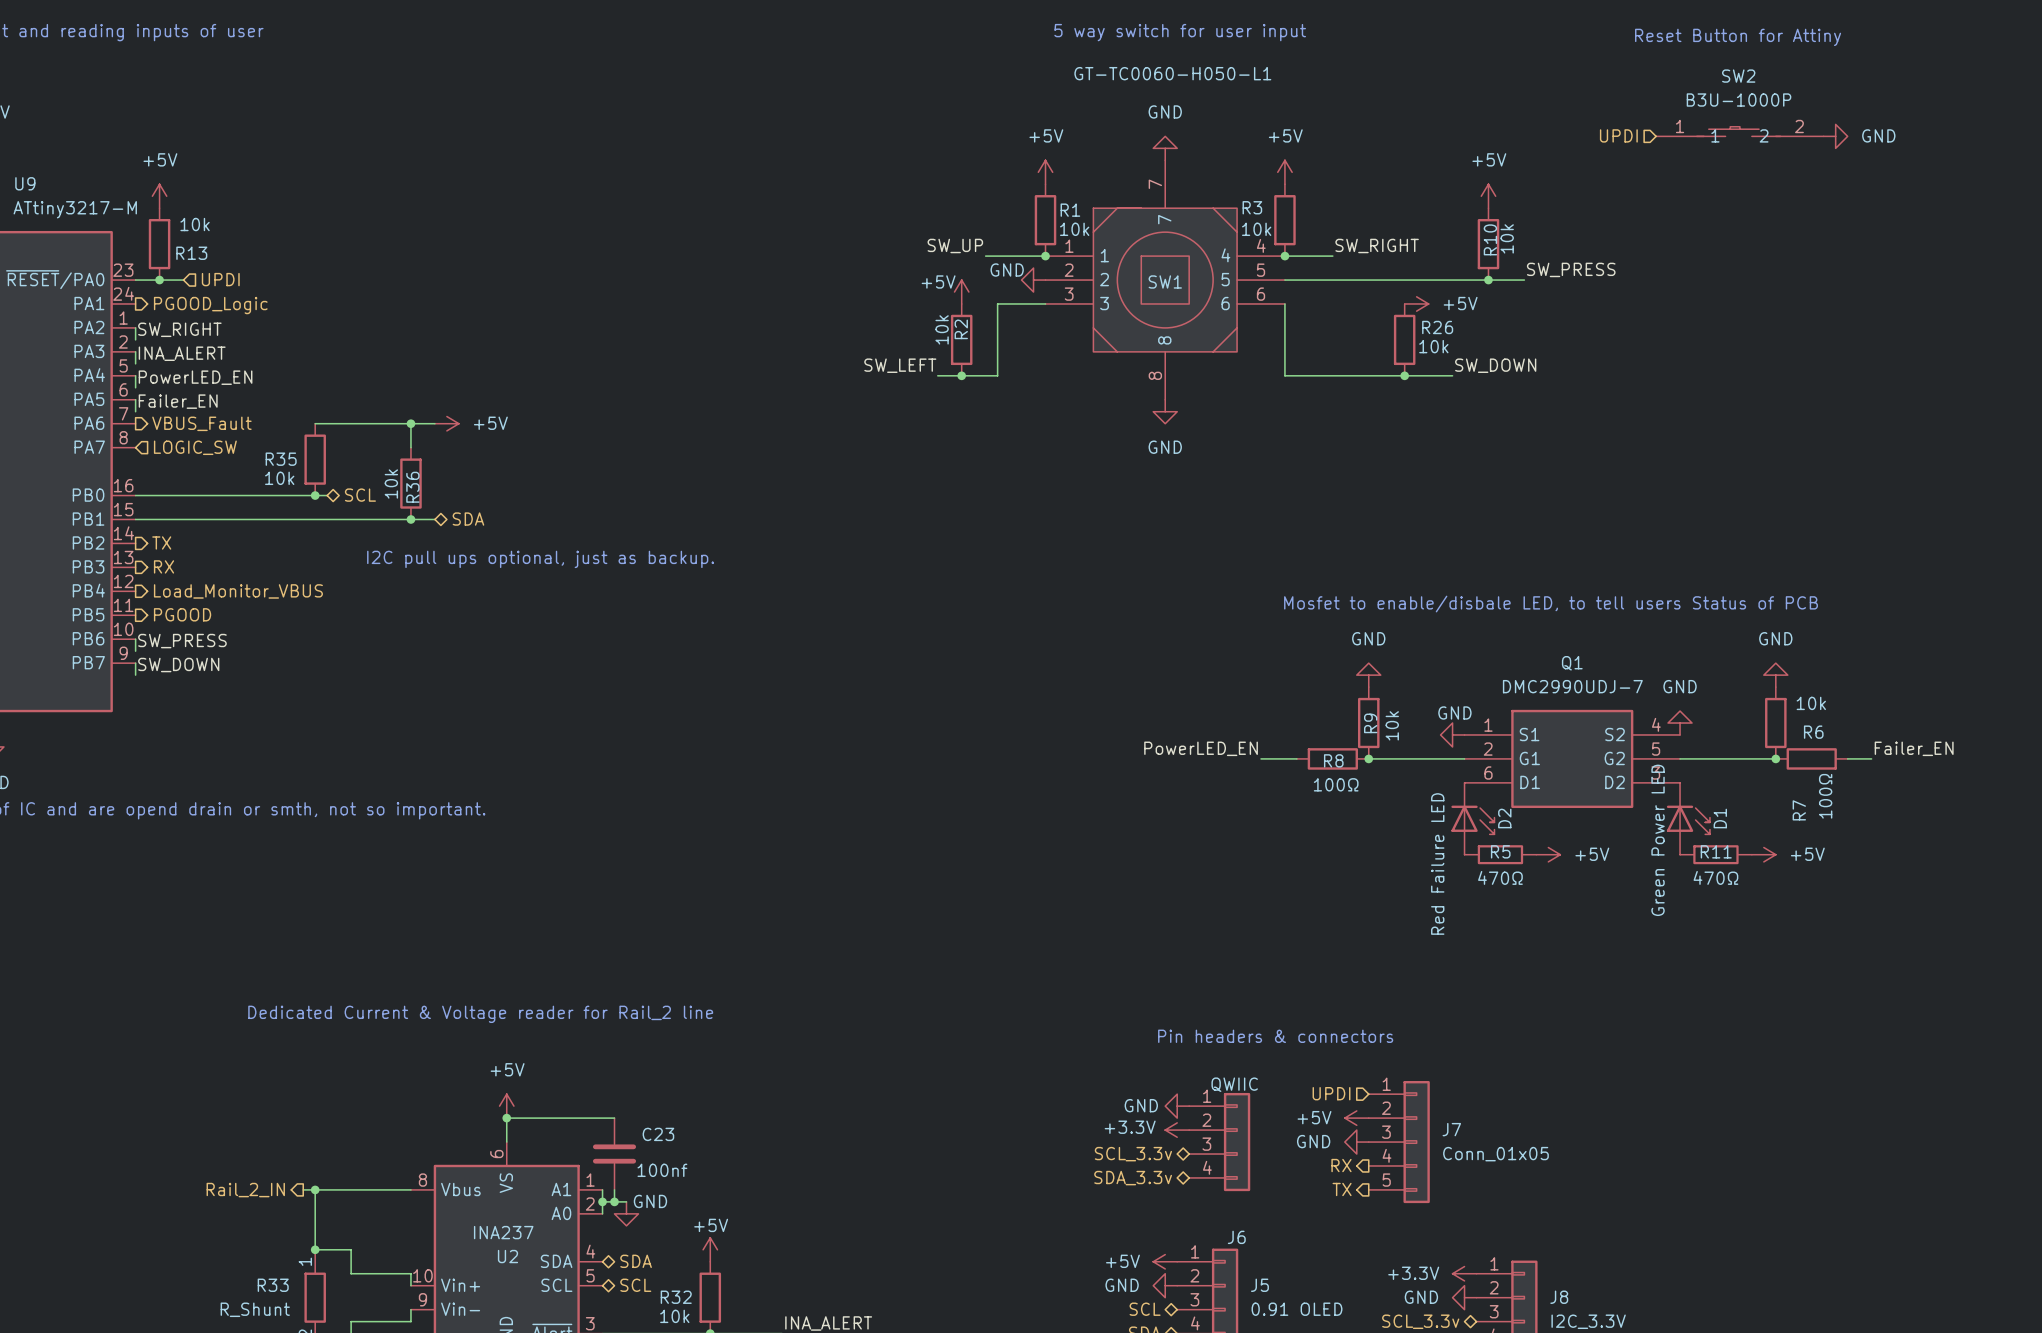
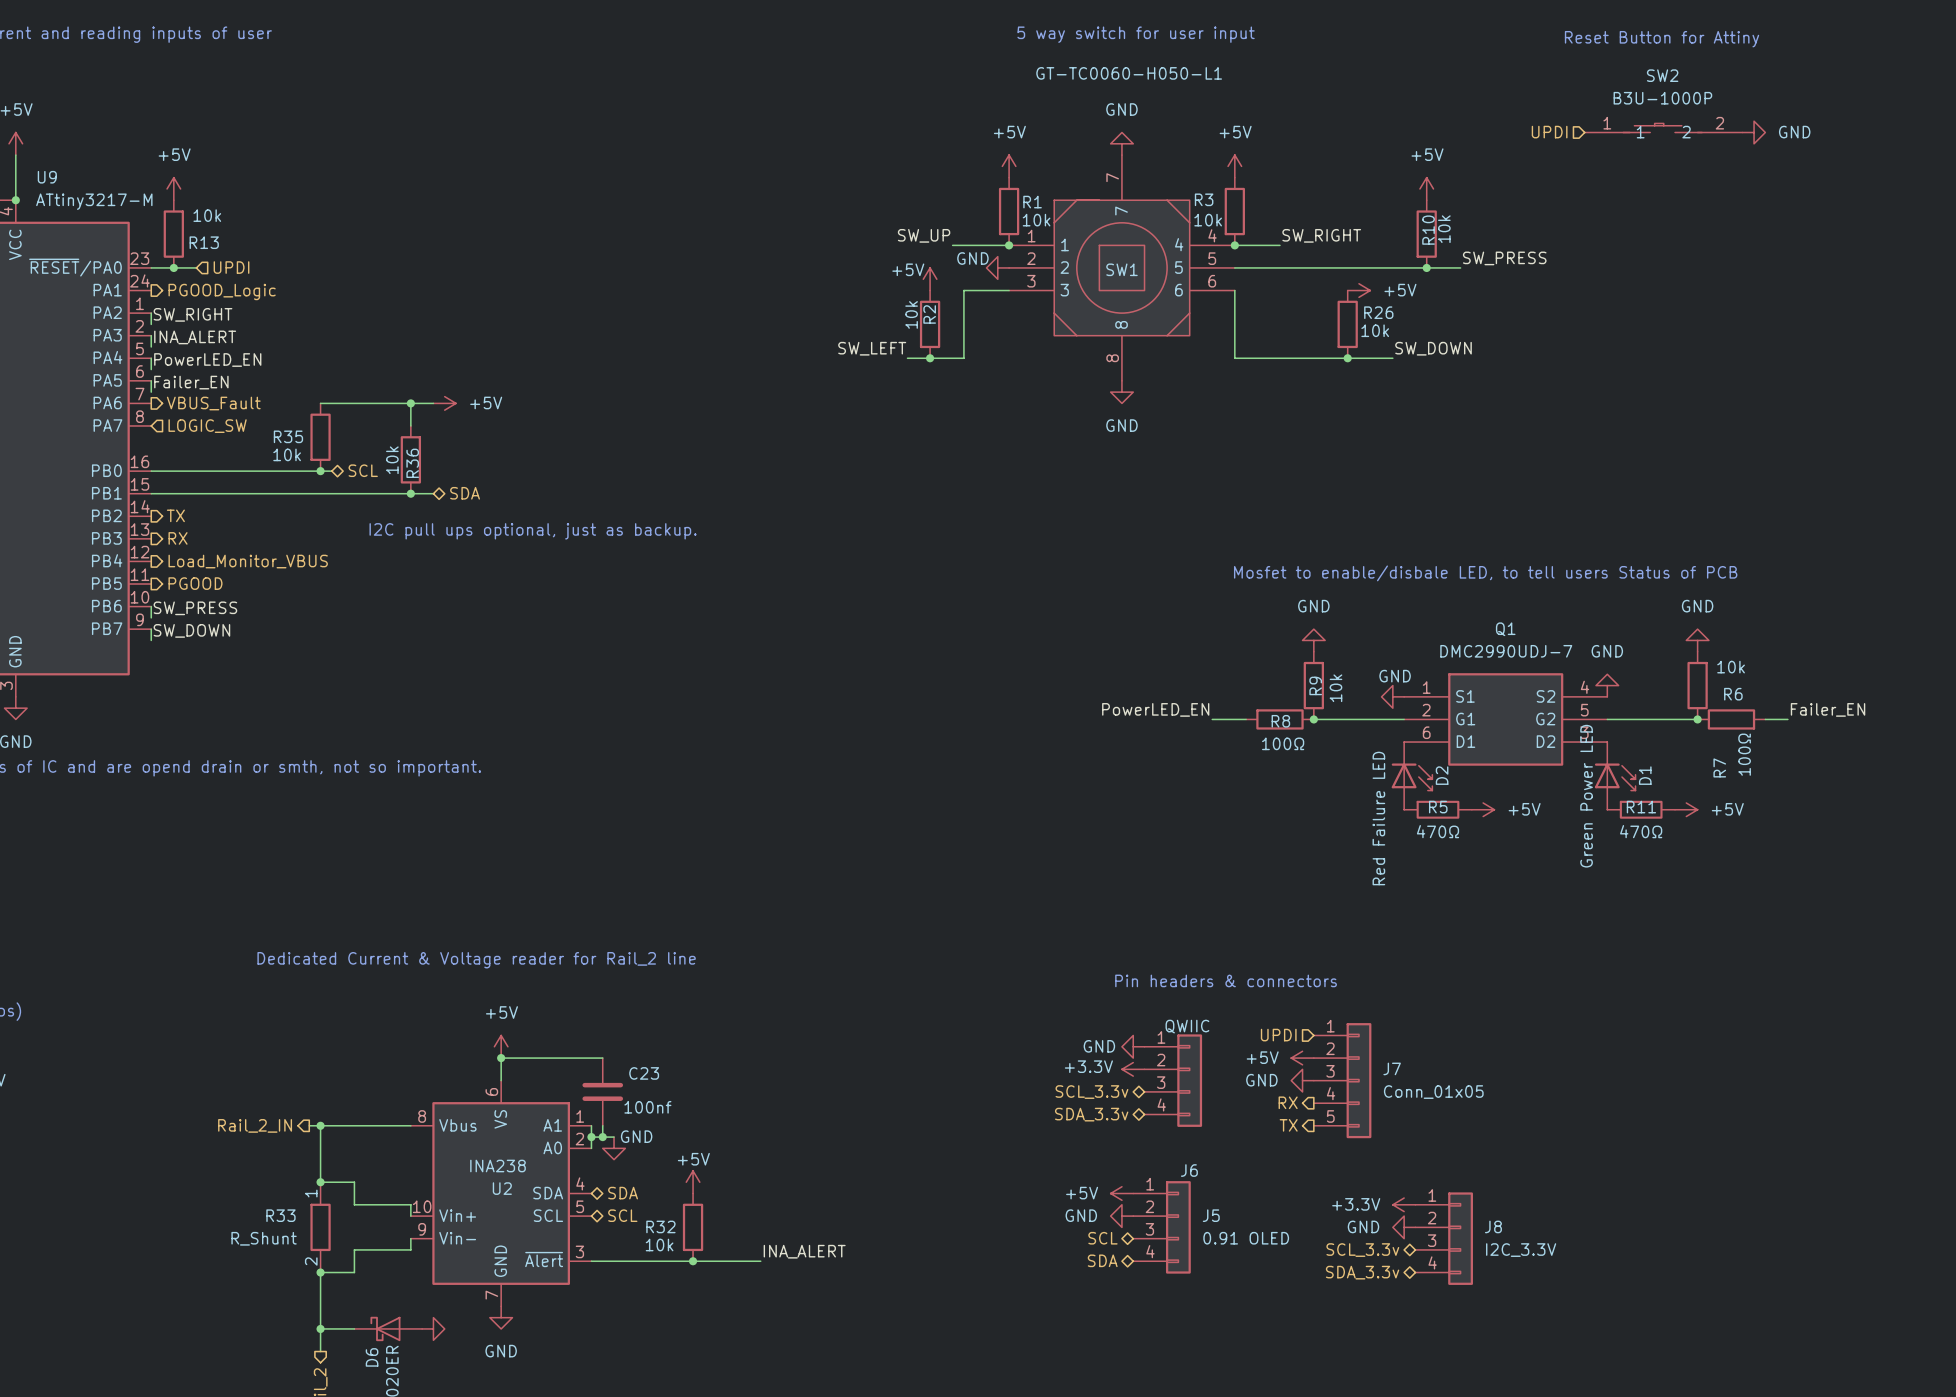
U2 value: INA237 (503, 1232) -> INA238 (498, 1166)

